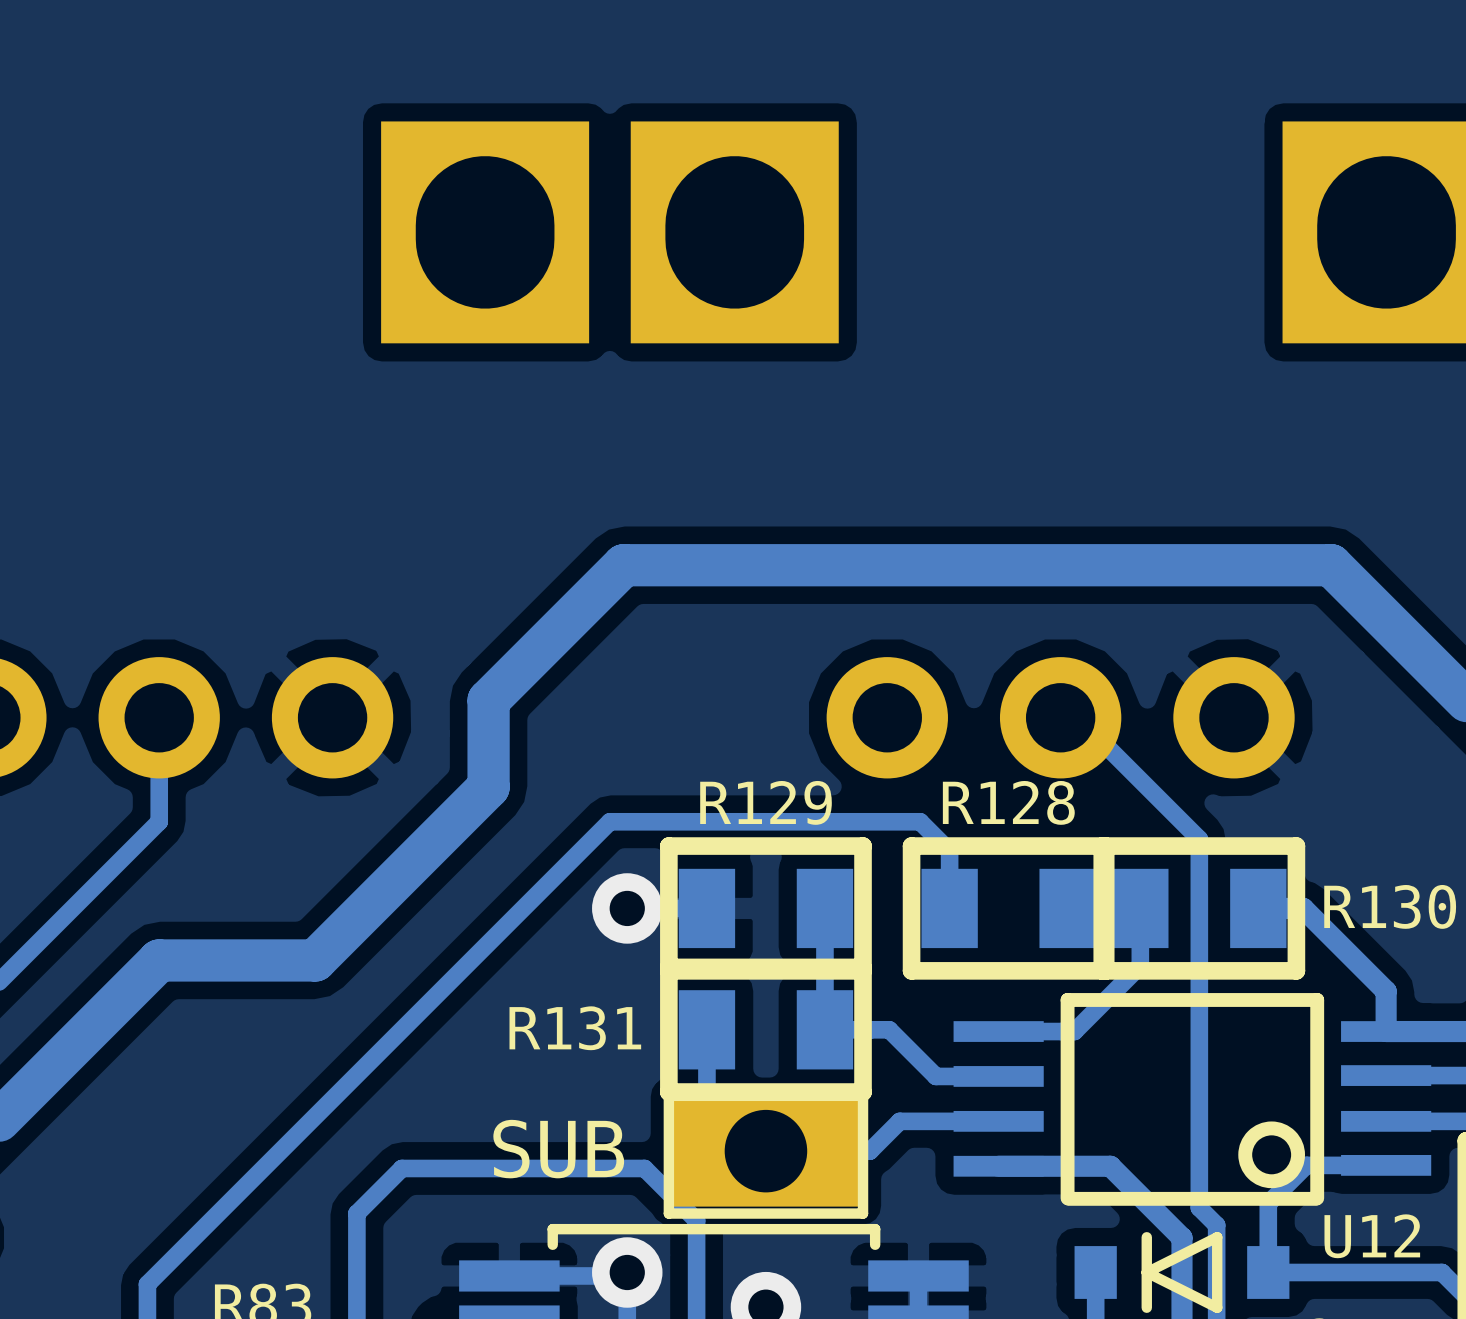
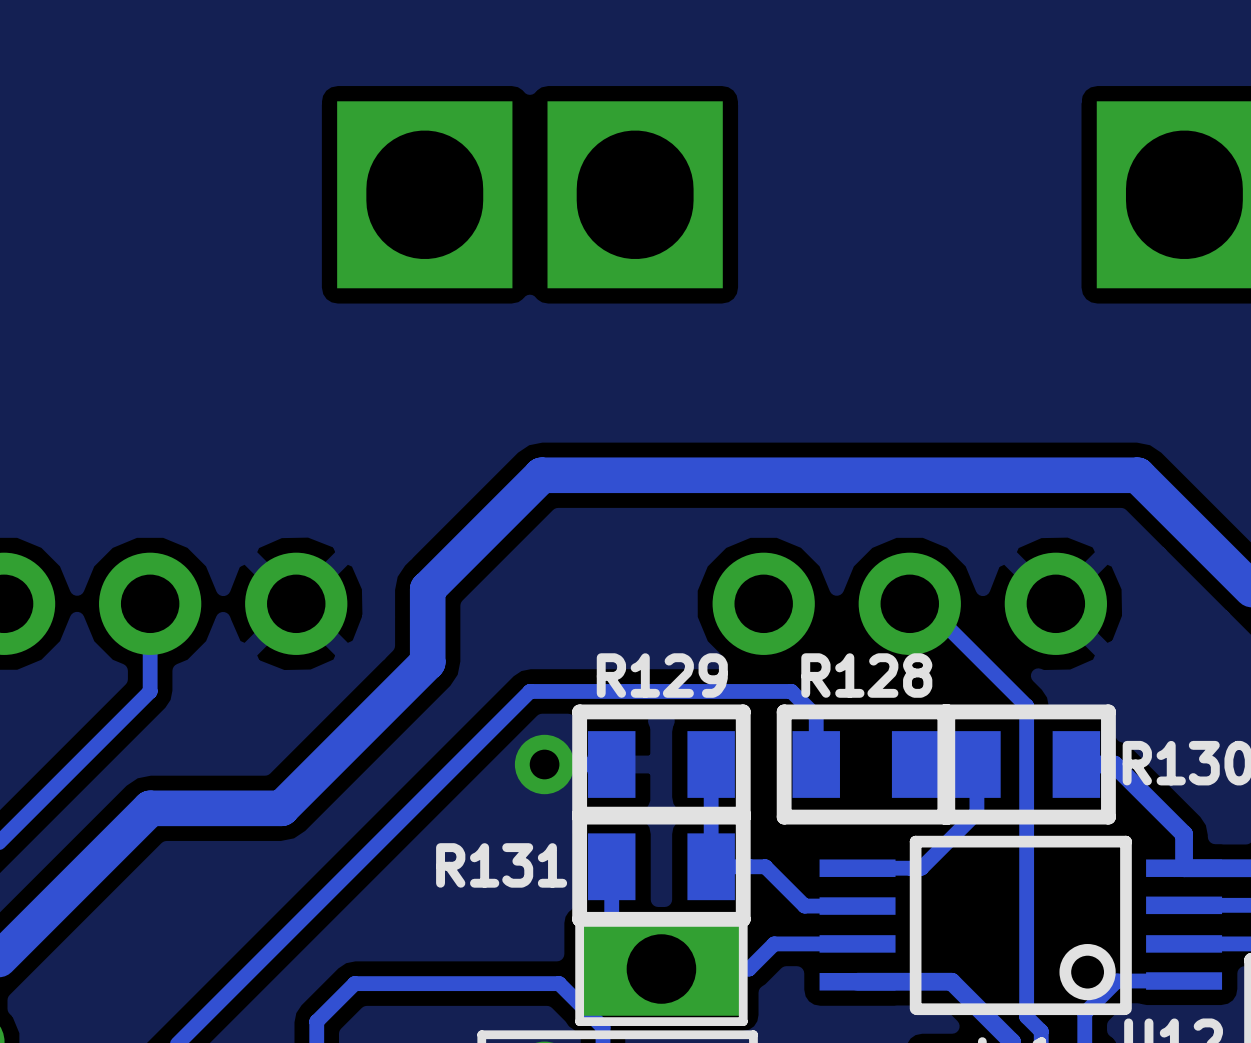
text: SUB (558, 1149) -> none

